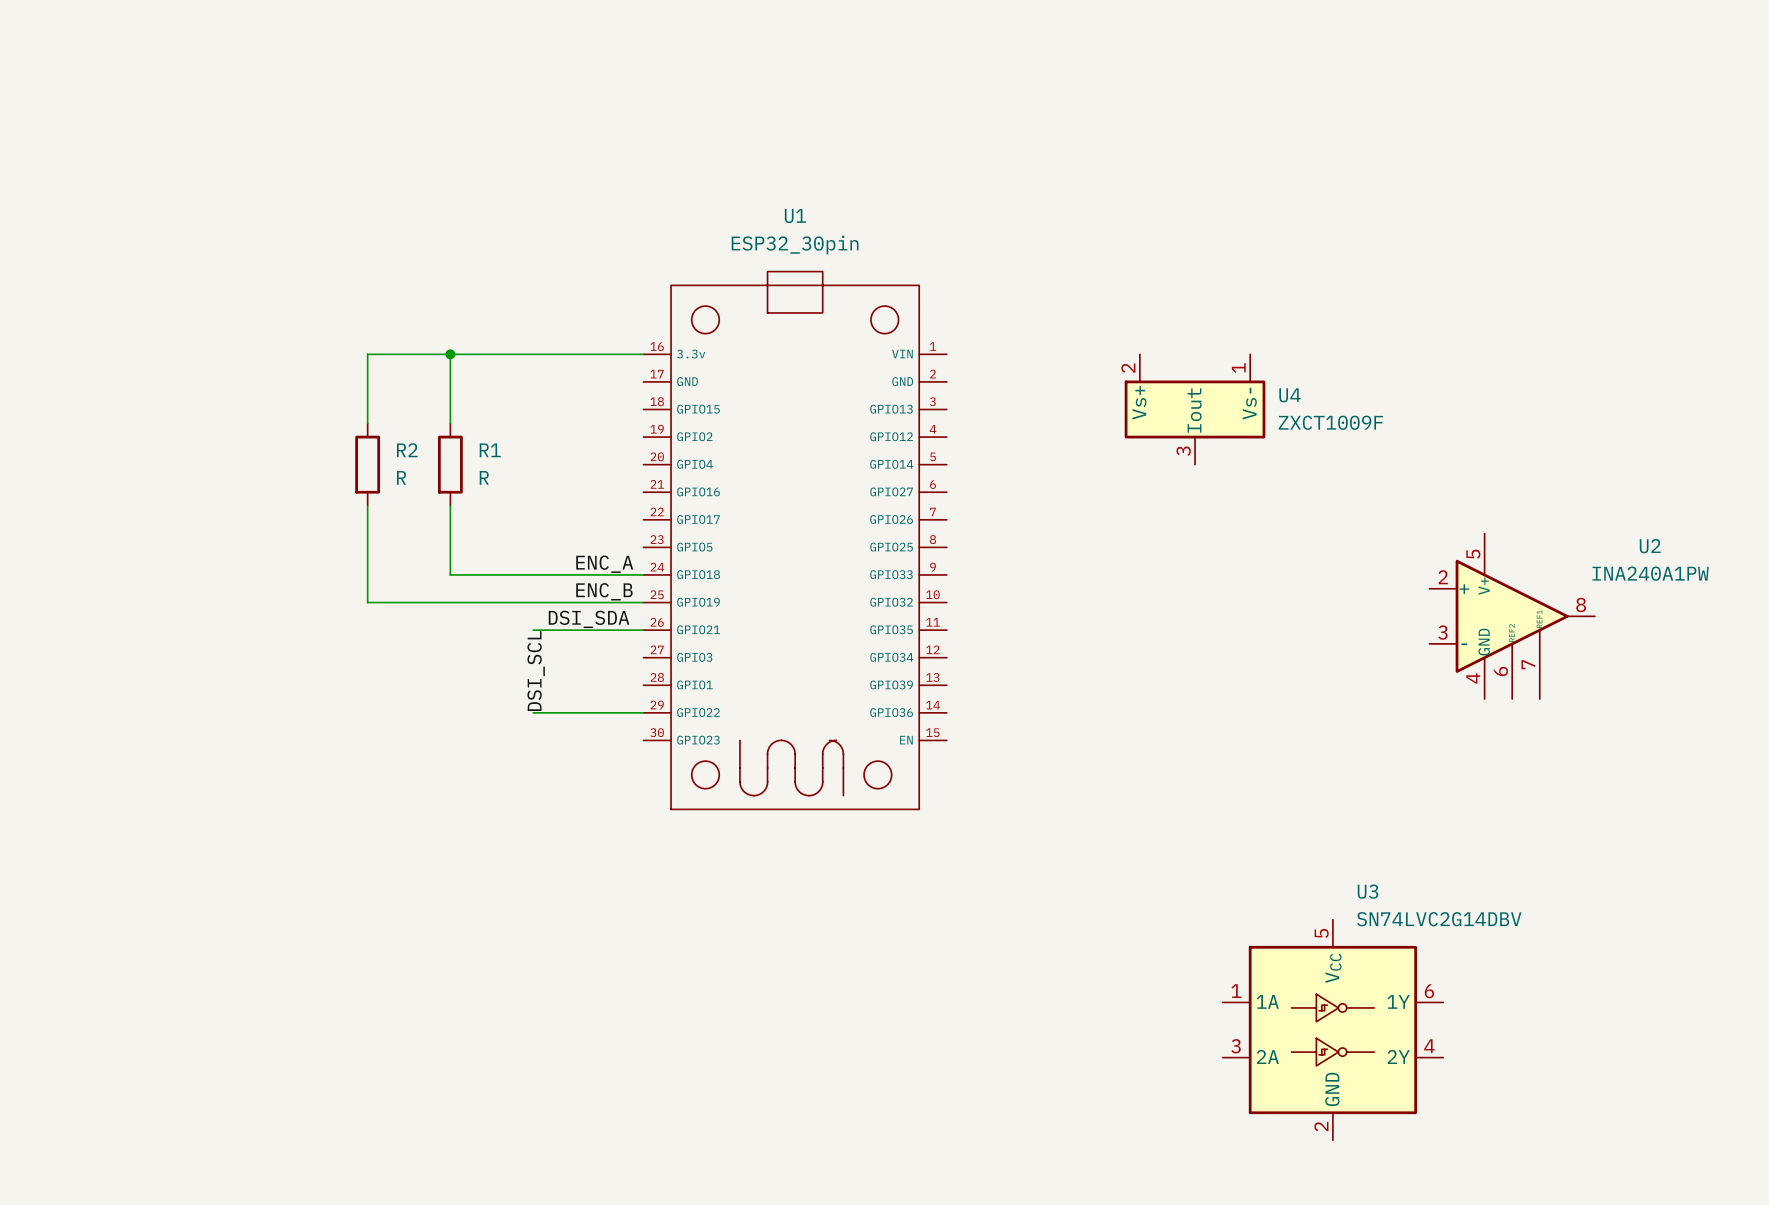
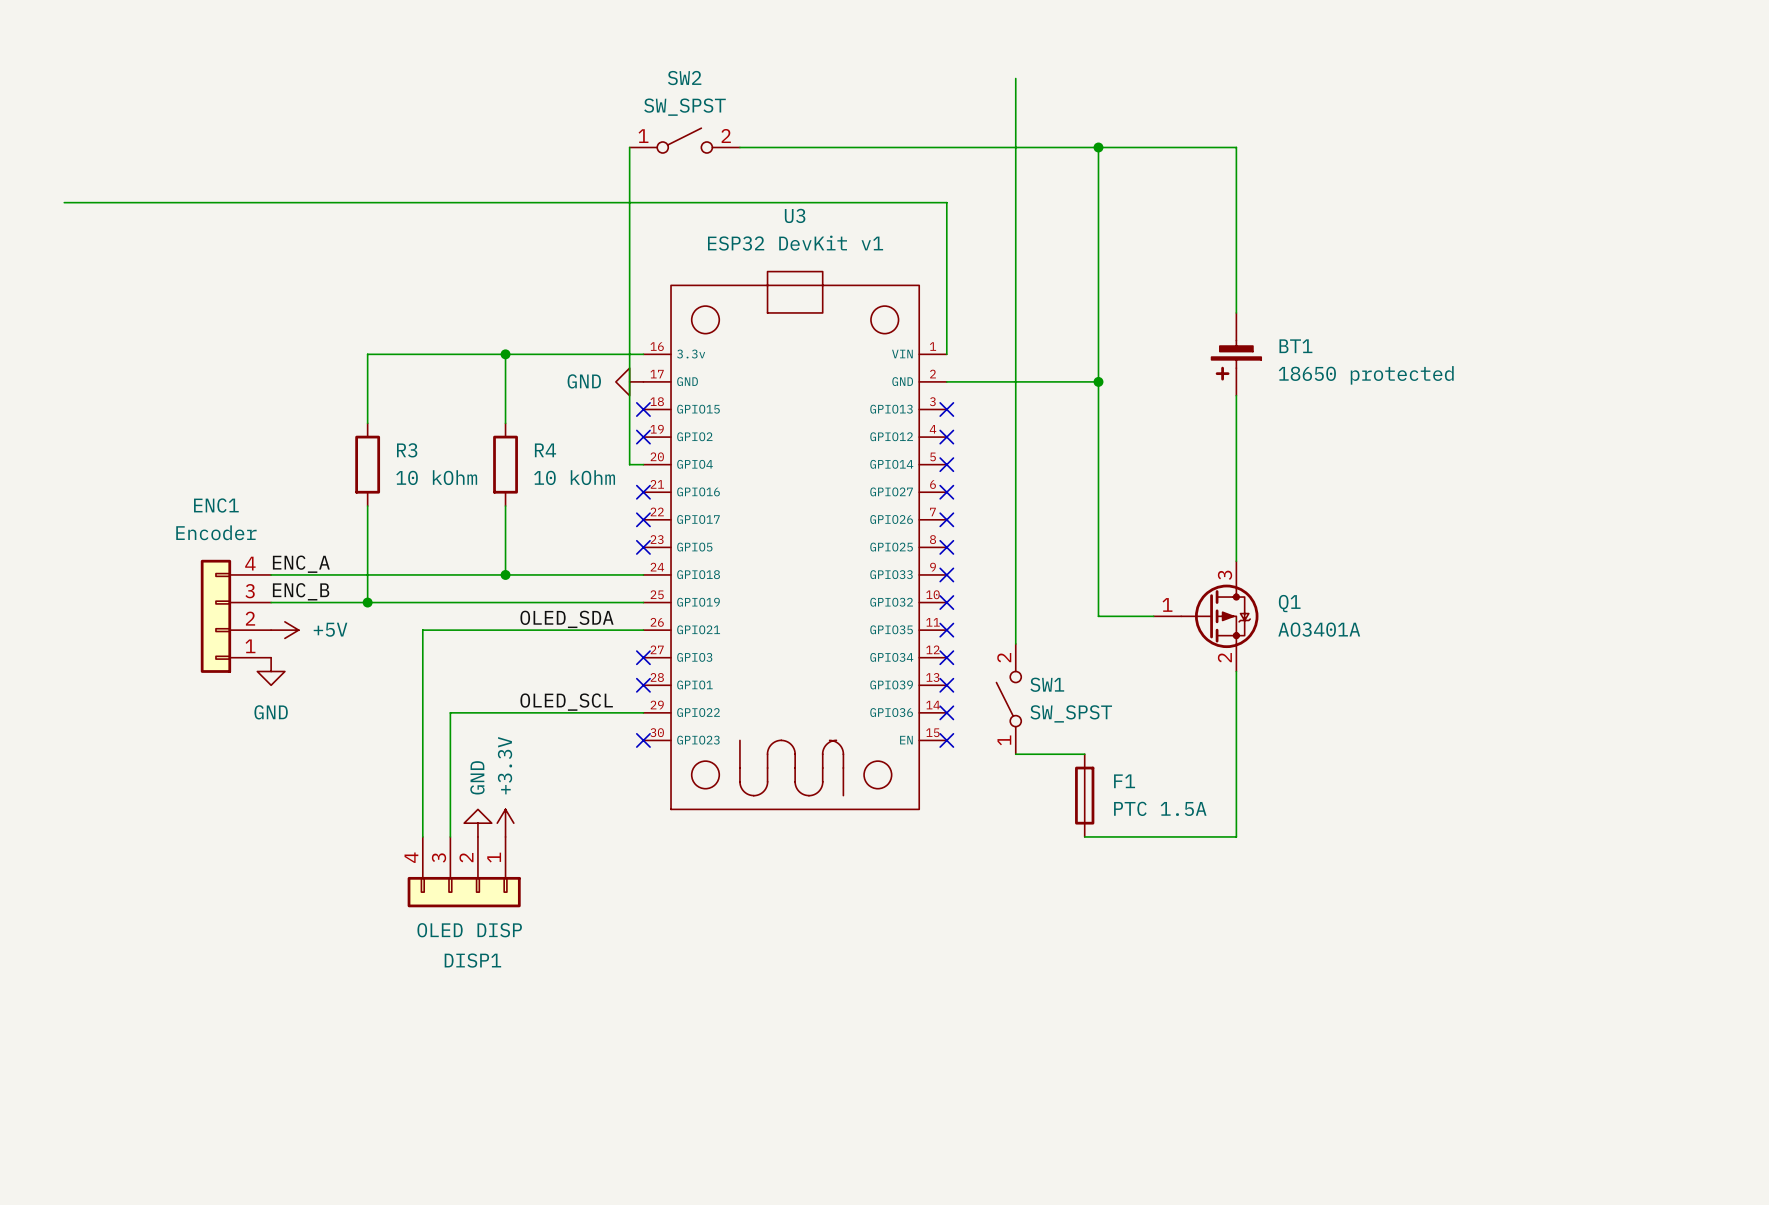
wire: none -> (1015, 78) (1015, 643)
SW2: none -> SW_SPST (684, 140)
wire: none -> (629, 147) (629, 464) (643, 464)
wire: none -> (739, 147) (1236, 147) (1236, 312)
wire: none -> (1098, 147) (1098, 616) (1153, 616)
junction: none -> (1098, 147)
wire: none -> (64, 202) (946, 202) (946, 354)
U1 name: U1 (795, 216) -> U3 (795, 215)
U1 text: ESP32_30pin (795, 244) -> ESP32 DevKit v1 (795, 243)
wire: (450, 354) (450, 423) -> (505, 354) (505, 423)
junction position: (450, 354) -> (505, 354)
BT1: none -> 18650 protected (1236, 354)
power symbol: none -> GND (629, 381)
wire: none -> (946, 381) (1098, 381)
junction: none -> (1098, 381)
wire: none -> (1236, 395) (1236, 561)
no-connect mark: none -> (643, 409)
no-connect mark: none -> (946, 409)
U4: ZXCT1009F (1195, 409) -> none
no-connect mark: none -> (643, 437)
no-connect mark: none -> (946, 437)
R2 name: R2 (407, 450) -> R3 (407, 450)
R1: R (450, 464) -> none
R4: none -> 10 kOhm (505, 464)
no-connect mark: none -> (946, 464)
R2 value: R (401, 477) -> 10 kOhm (436, 477)
no-connect mark: none -> (643, 492)
no-connect mark: none -> (946, 492)
wire: (450, 506) (450, 574) -> (271, 574) (450, 574)
wire: none -> (505, 506) (505, 574)
no-connect mark: none -> (643, 519)
no-connect mark: none -> (946, 519)
no-connect mark: none -> (643, 547)
no-connect mark: none -> (946, 547)
label: none -> ENC_A (301, 564)
label: ENC_A (604, 564) -> none
junction: none -> (505, 574)
no-connect mark: none -> (946, 574)
label: none -> ENC_B (301, 591)
label: ENC_B (604, 591) -> none
wire: none -> (271, 602) (367, 602)
junction: none -> (367, 602)
no-connect mark: none -> (946, 602)
ENC1: none -> Encoder (235, 616)
Q1: none -> AO3401A (1206, 616)
U2: INA240A1PW (1512, 616) -> none
label: DSI_SDA (589, 619) -> OLED_SDA (567, 619)
power symbol: none -> +5V (284, 630)
wire: none -> (533, 630) (422, 630) (422, 836)
no-connect mark: none -> (946, 630)
no-connect mark: none -> (643, 657)
no-connect mark: none -> (946, 657)
power symbol: none -> GND (271, 671)
label: DSI_SCL (536, 671) -> OLED_SCL (566, 702)
wire: none -> (1236, 671) (1236, 836) (1084, 836)
no-connect mark: none -> (643, 685)
no-connect mark: none -> (946, 685)
SW1: none -> SW_SPST (1008, 699)
wire: none -> (533, 712) (450, 712) (450, 836)
no-connect mark: none -> (946, 712)
no-connect mark: none -> (643, 740)
no-connect mark: none -> (946, 740)
wire: none -> (1015, 754) (1084, 754)
F1: none -> PTC 1.5A (1084, 795)
power symbol: none -> GND (477, 823)
power symbol: none -> +3.3V (505, 823)
DISP1: none -> OLED DISP (464, 872)
U3: SN74LVC2G14DBV (1332, 1030) -> none

